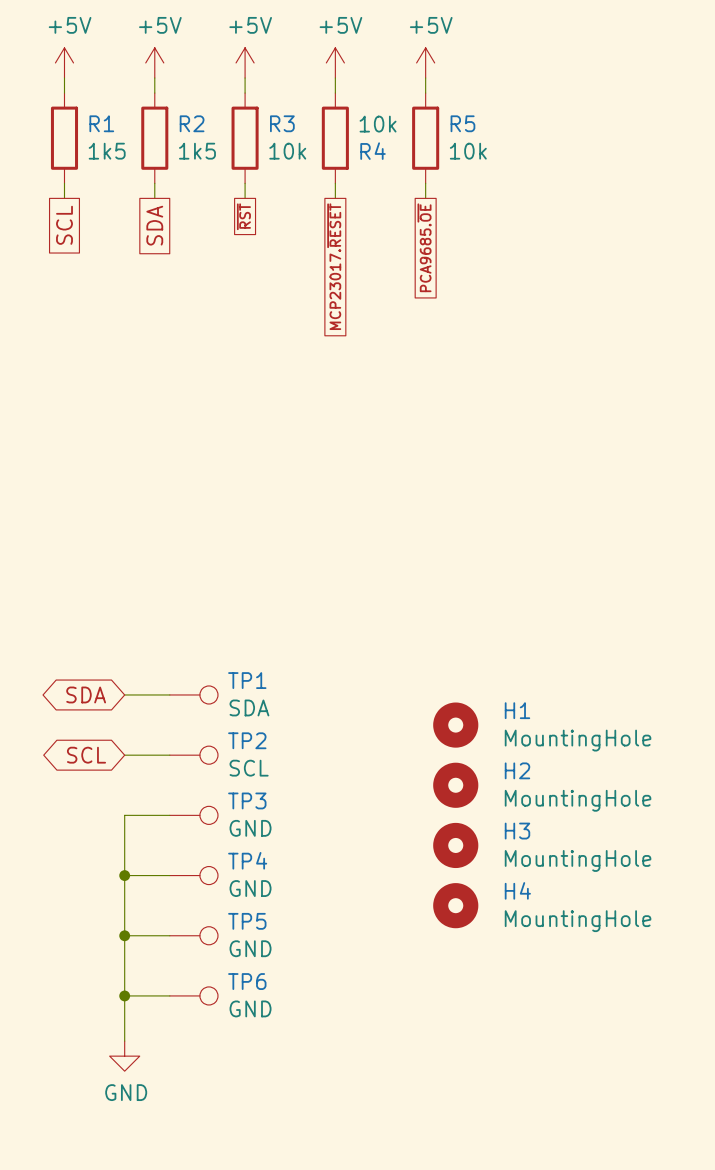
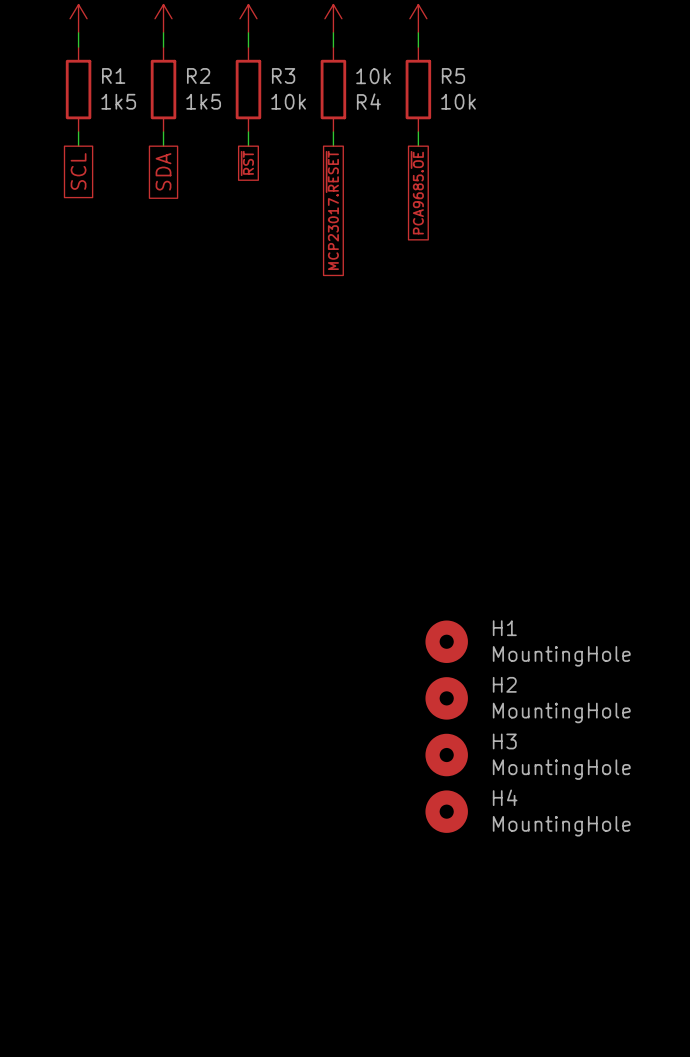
global label: SDA (86, 694) -> none
wire: (124, 694) (169, 694) -> none
TP1: SDA (193, 694) -> none
global label: SCL (86, 755) -> none
wire: (124, 755) (169, 755) -> none
TP2: SCL (193, 755) -> none
wire: (169, 815) (124, 815) (124, 1041) -> none
TP3: GND (193, 815) -> none
wire: (124, 875) (169, 875) -> none
junction: (124, 875) -> none
TP4: GND (193, 875) -> none
wire: (124, 935) (169, 935) -> none
junction: (124, 935) -> none
TP5: GND (193, 935) -> none
wire: (124, 995) (169, 995) -> none
junction: (124, 995) -> none
TP6: GND (193, 995) -> none
power symbol: GND (124, 1056) -> none

